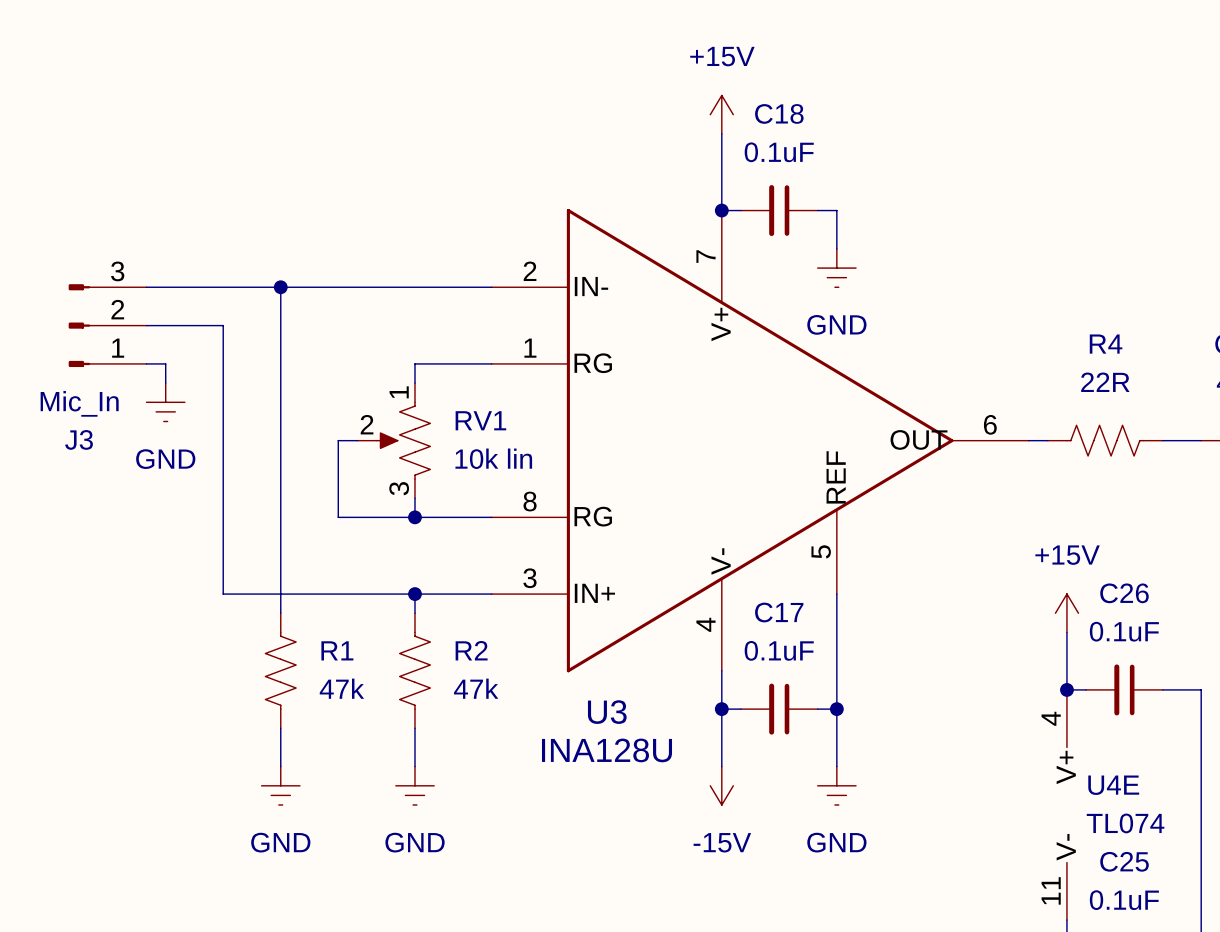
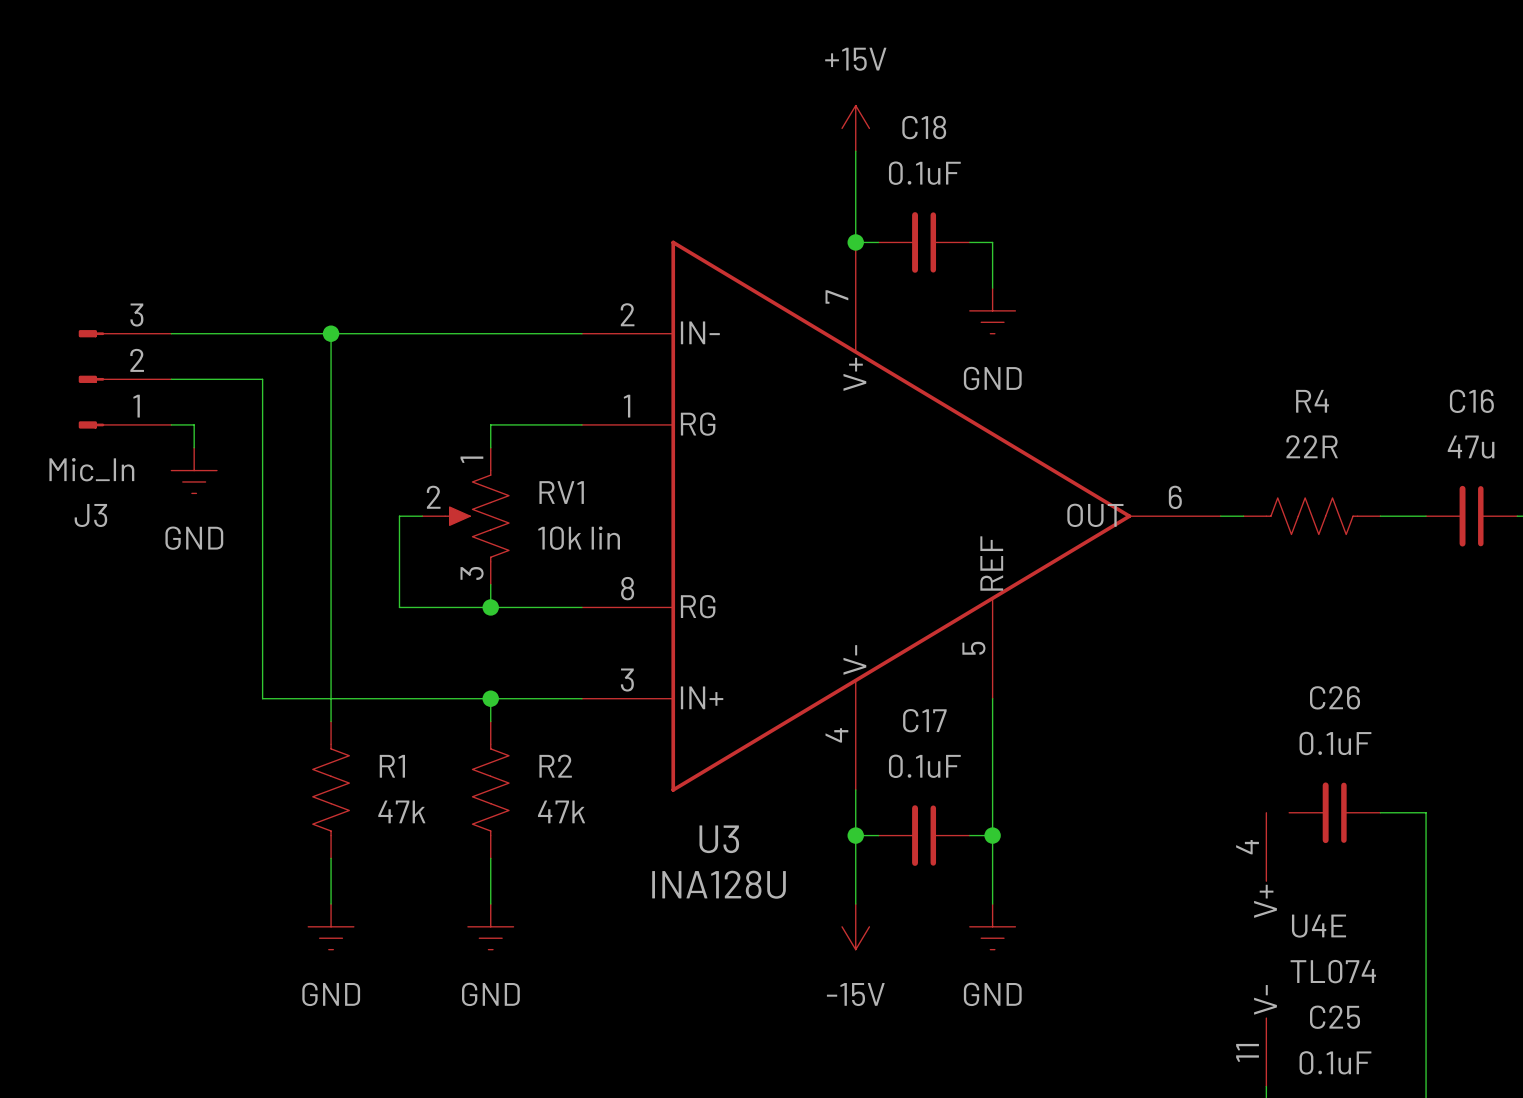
power symbol: +15V (1066, 613) -> none
wire: (1066, 632) (1066, 689) (1086, 689) -> none
junction: (1066, 689) -> none

